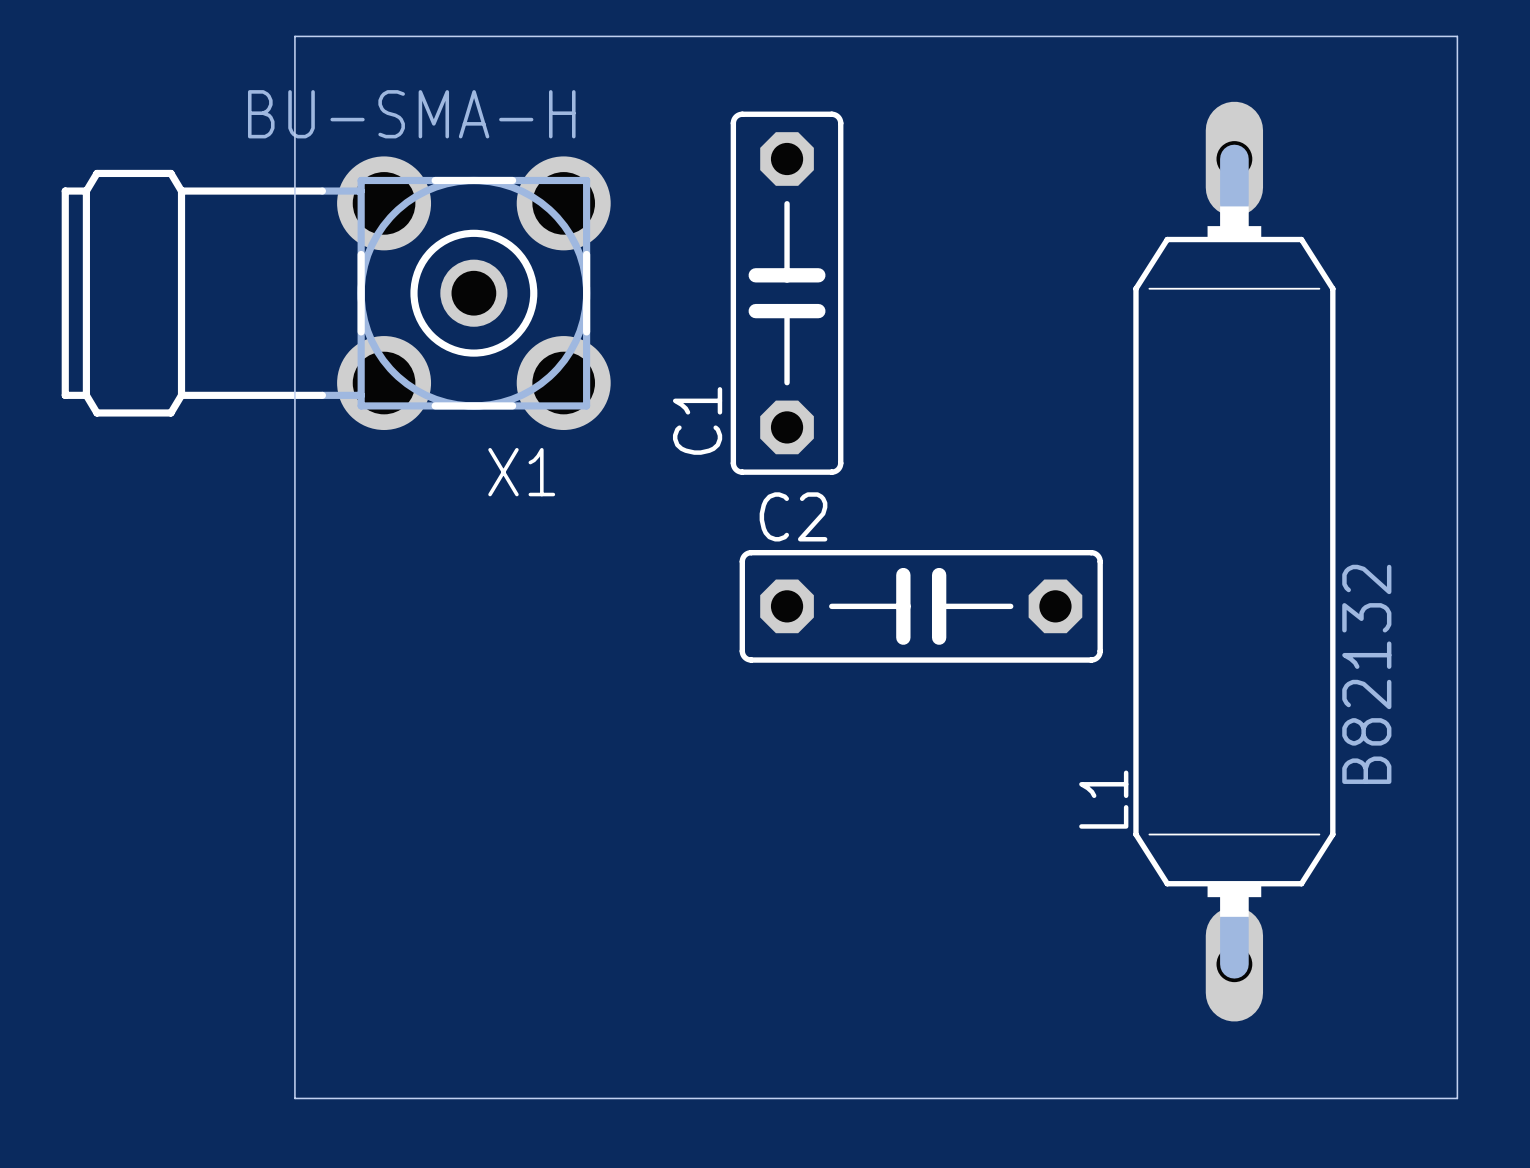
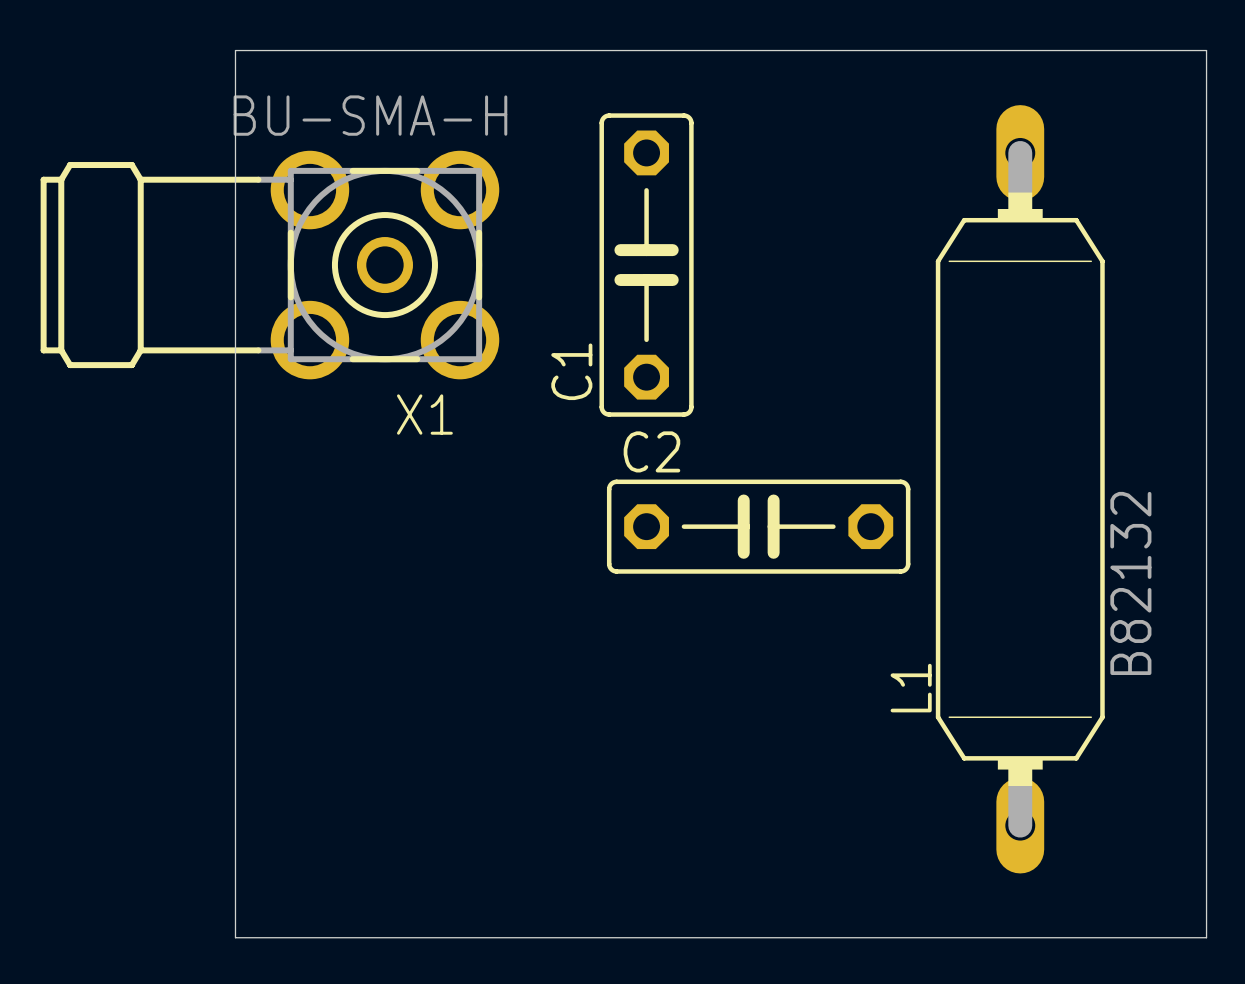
X1 value position: BU-SMA-H (411, 114) -> BU-SMA-H (370, 115)

